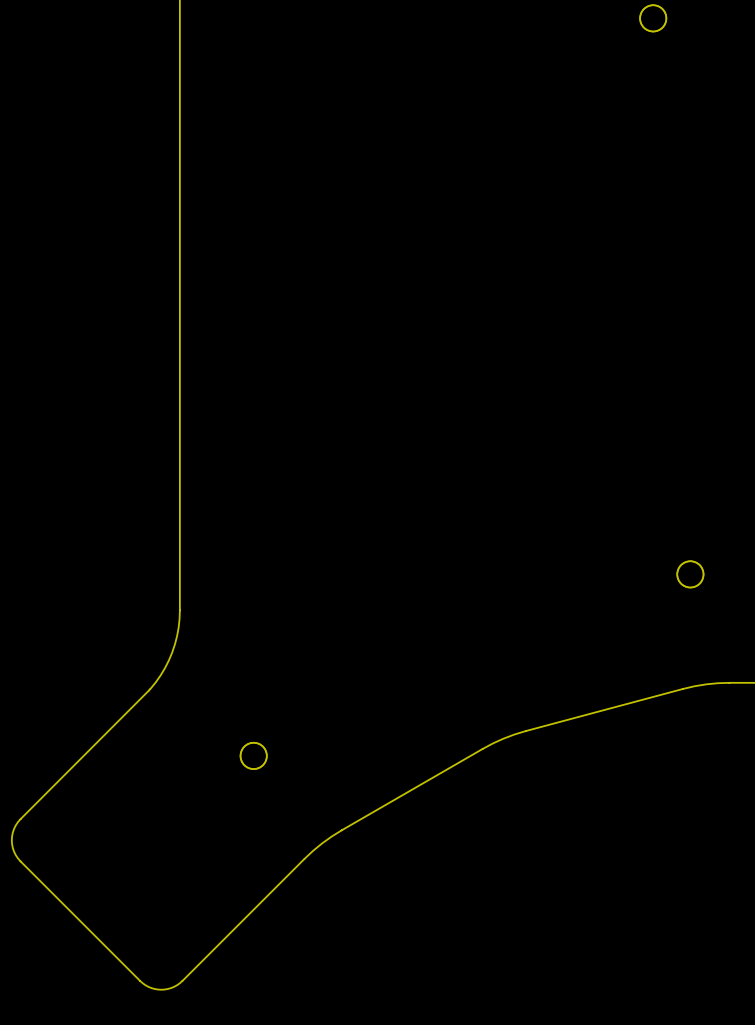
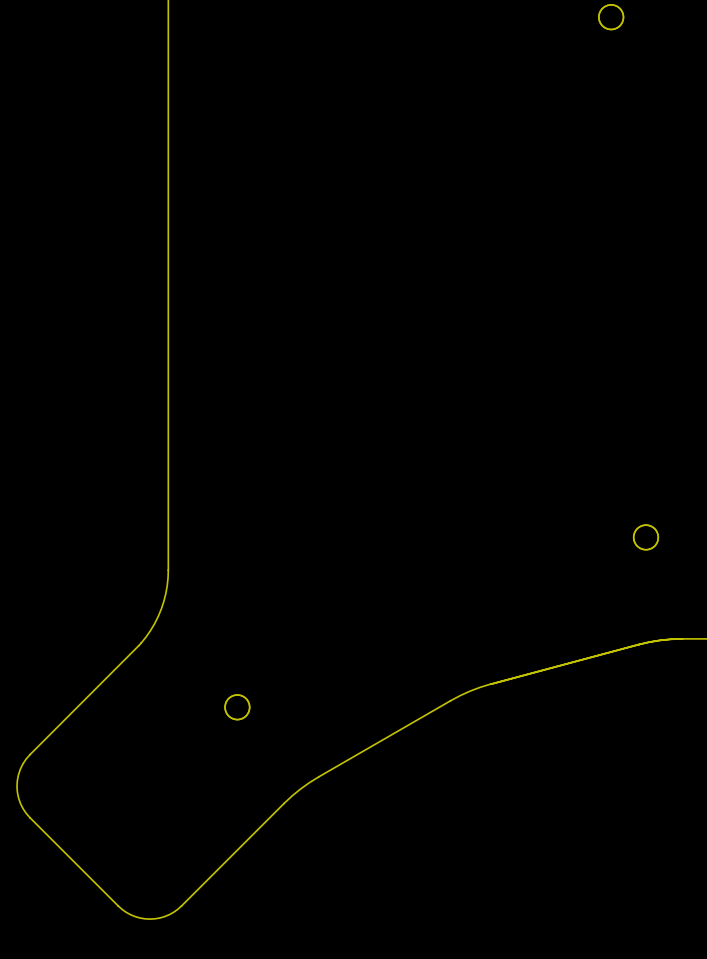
board edge: (179, 609) (174, 644) (165, 668) (155, 682) (20, 819) (14, 828) (12, 836) (12, 848) (20, 861) (140, 980) (151, 988) (167, 988) (179, 983) (304, 858) (331, 836) (482, 748) (503, 738) (525, 731) -> (168, 570) (163, 601) (158, 616) (146, 636) (30, 754) (20, 769) (17, 780) (18, 797) (22, 808) (30, 817) (122, 909) (135, 916) (144, 918) (159, 917) (177, 909) (283, 803) (309, 782) (460, 695) (491, 684) (638, 644) (682, 638)

